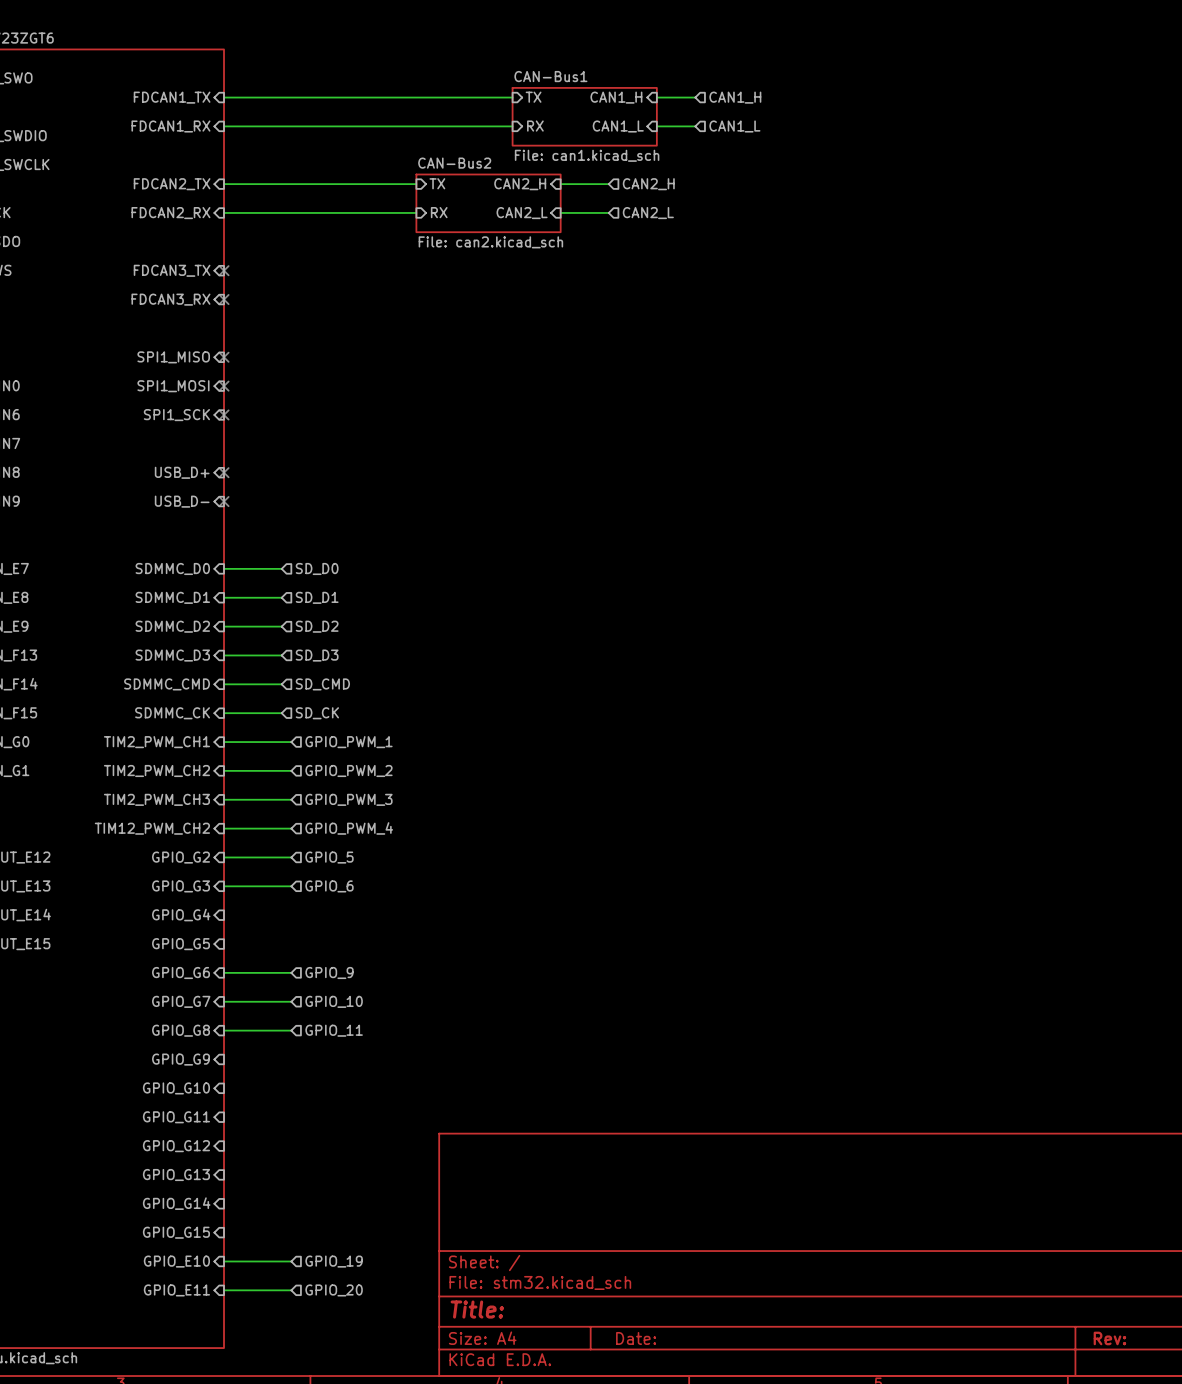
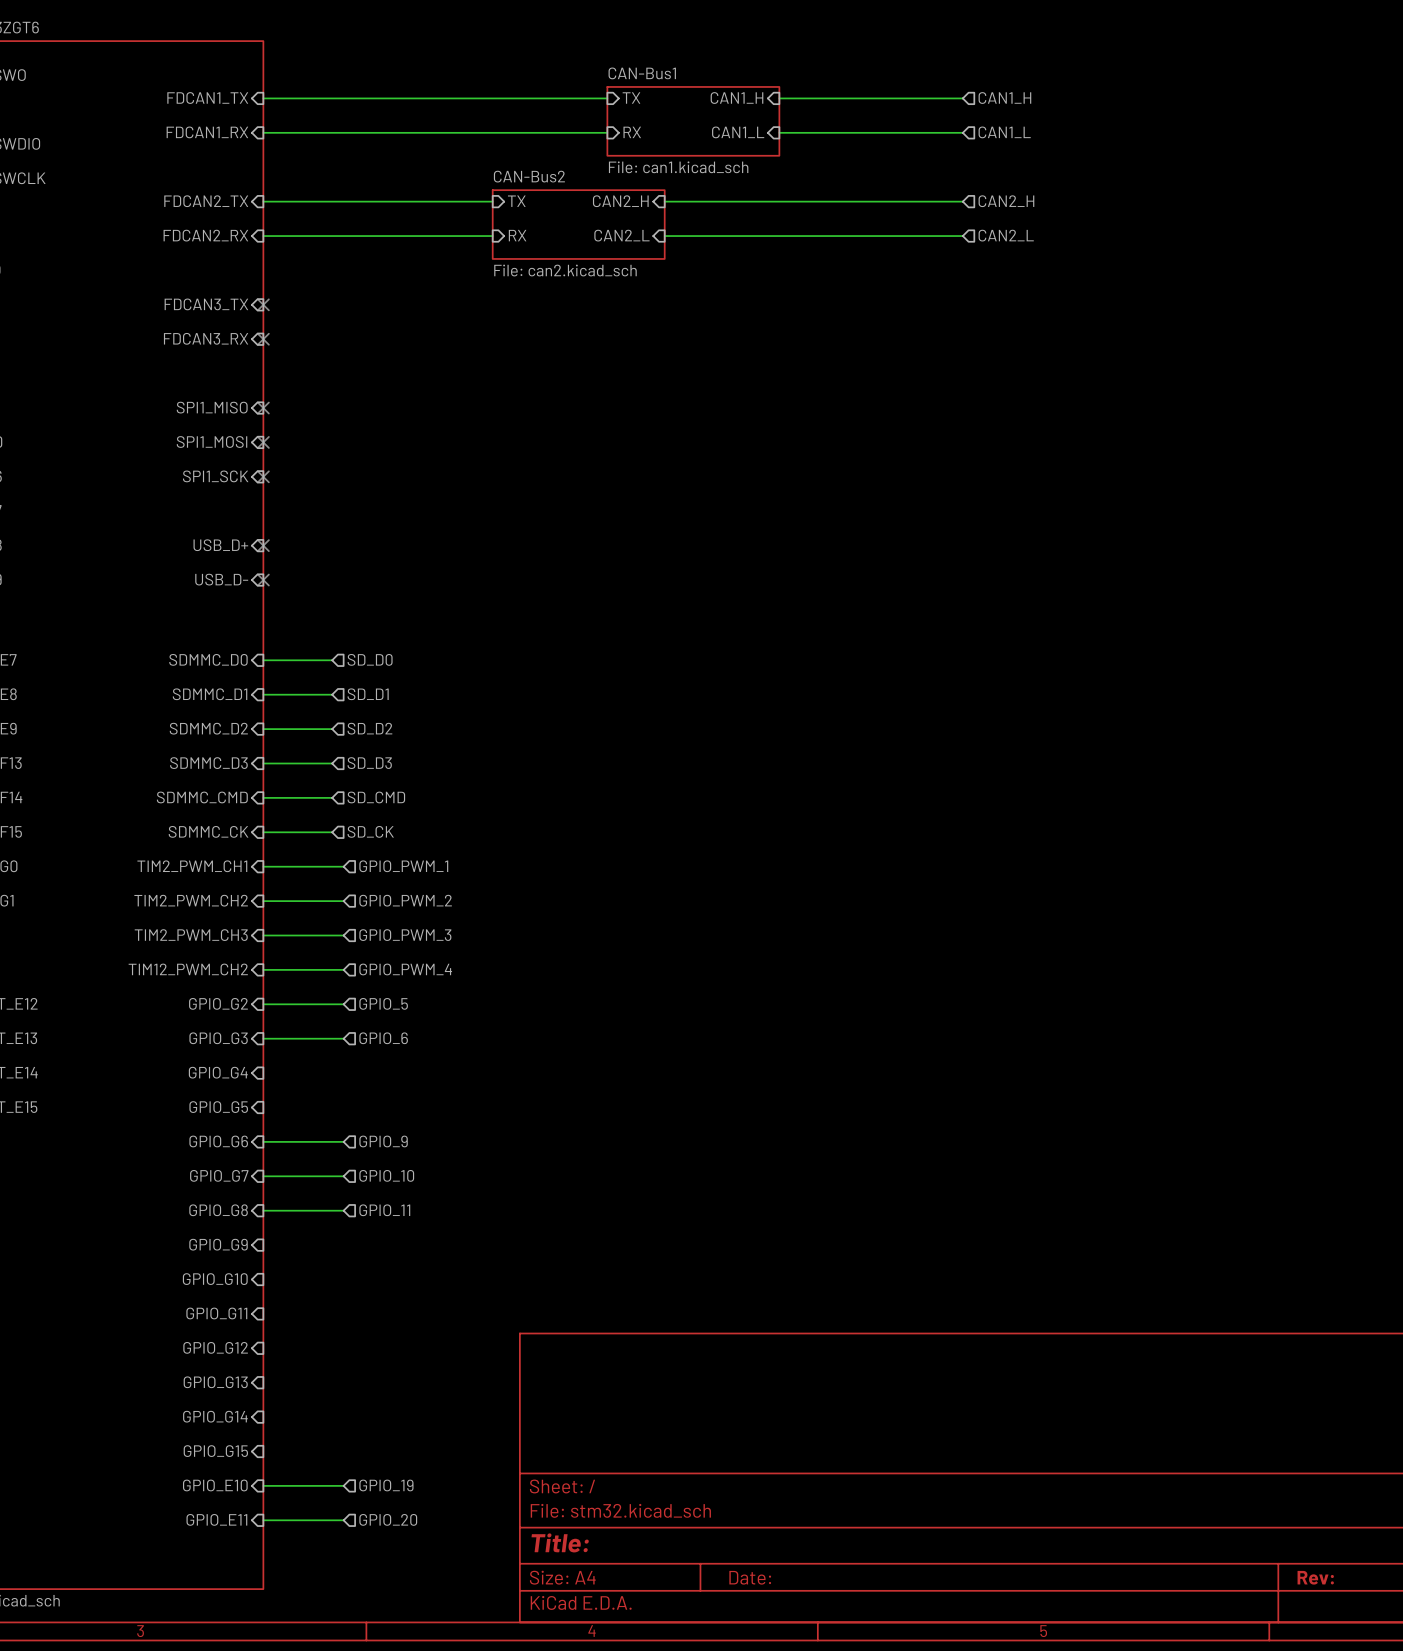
wire: none -> (825, 98) (962, 98)
hierarchical label position: CAN1_H (735, 97) -> CAN1_H (1004, 98)
wire: none -> (825, 132) (962, 132)
hierarchical label position: CAN1_L (734, 126) -> CAN1_L (1004, 132)
wire: none -> (722, 201) (962, 201)
hierarchical label: CAN2_H (648, 184) -> none
hierarchical label: none -> CAN2_H (1006, 201)
wire: none -> (722, 236) (962, 236)
hierarchical label: CAN2_L (648, 213) -> none
hierarchical label: none -> CAN2_L (1006, 235)

